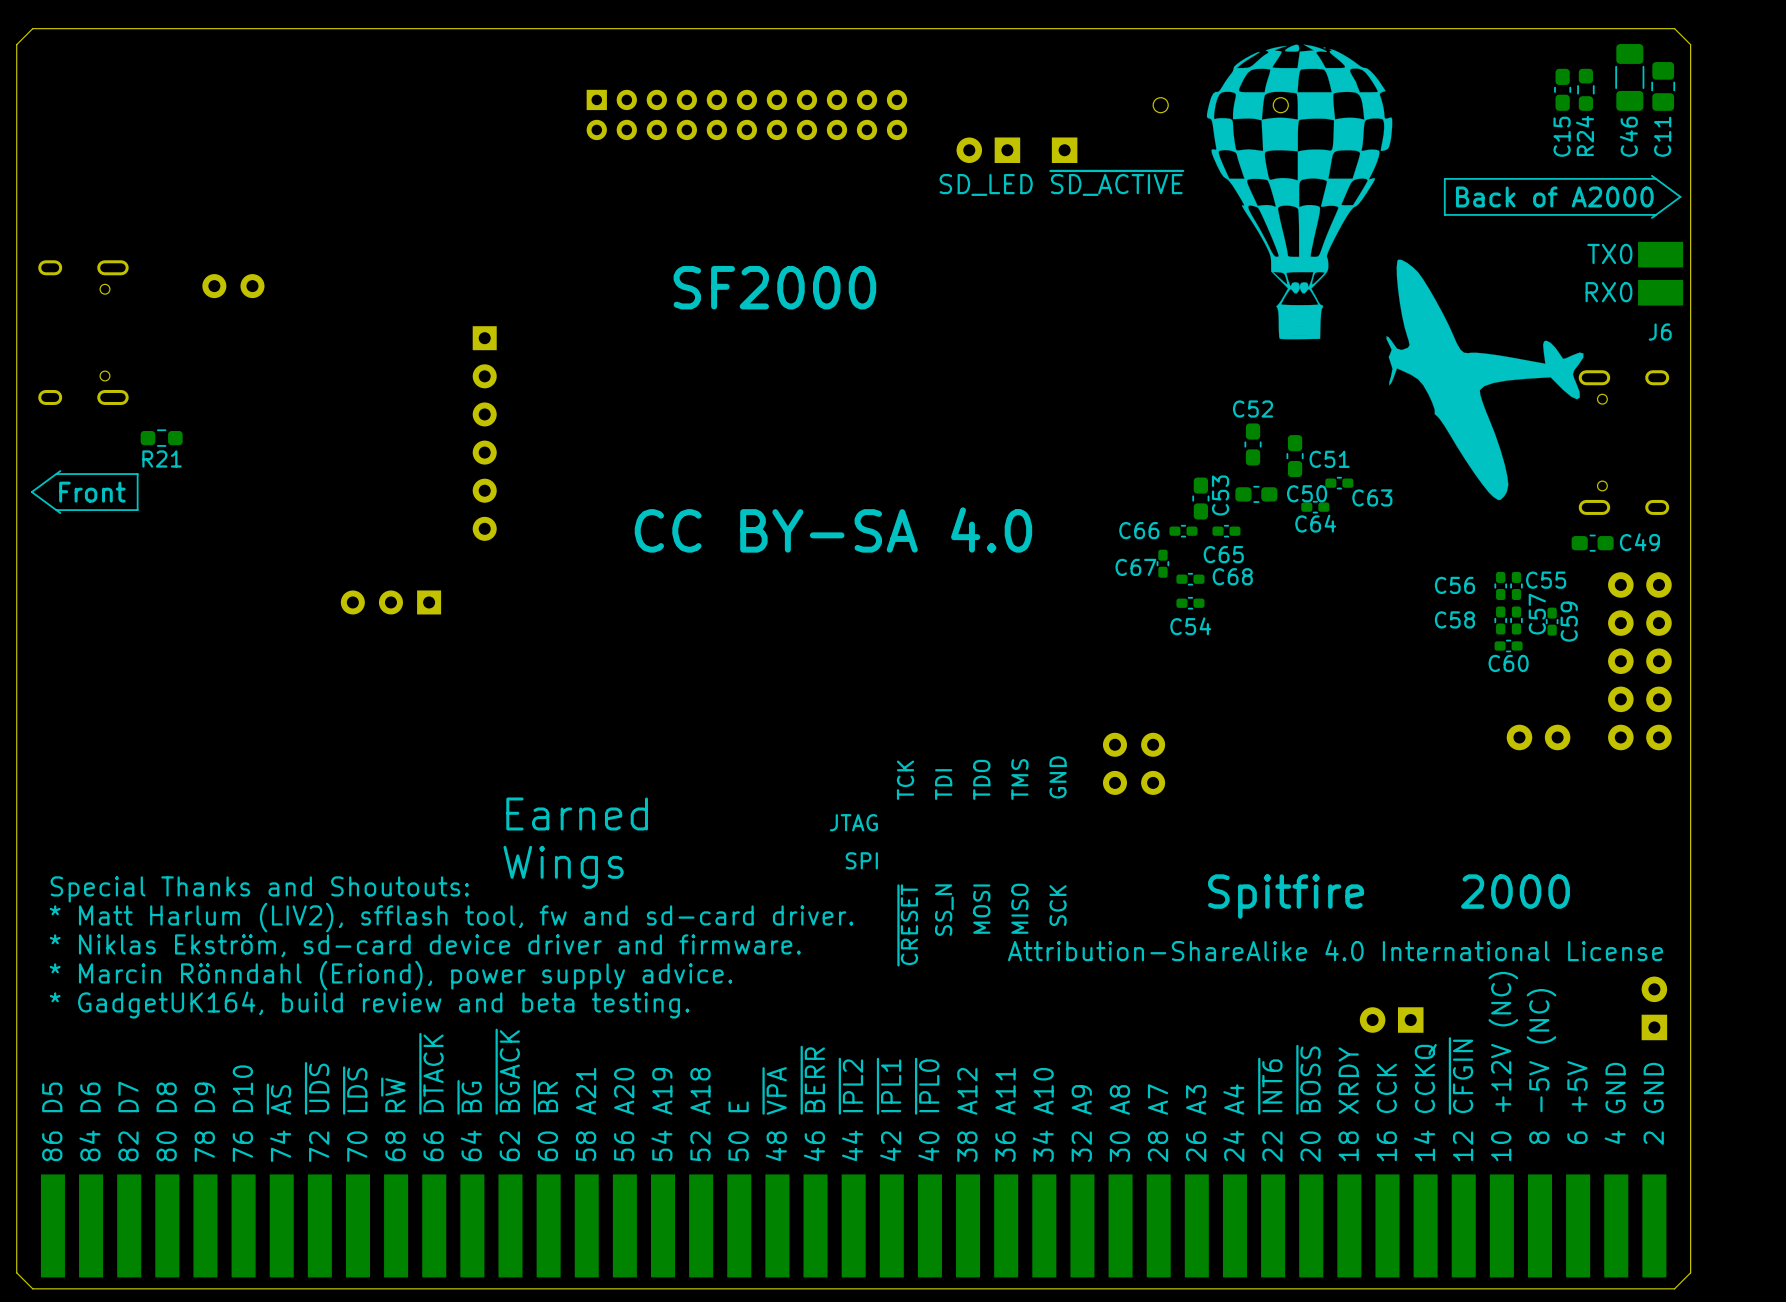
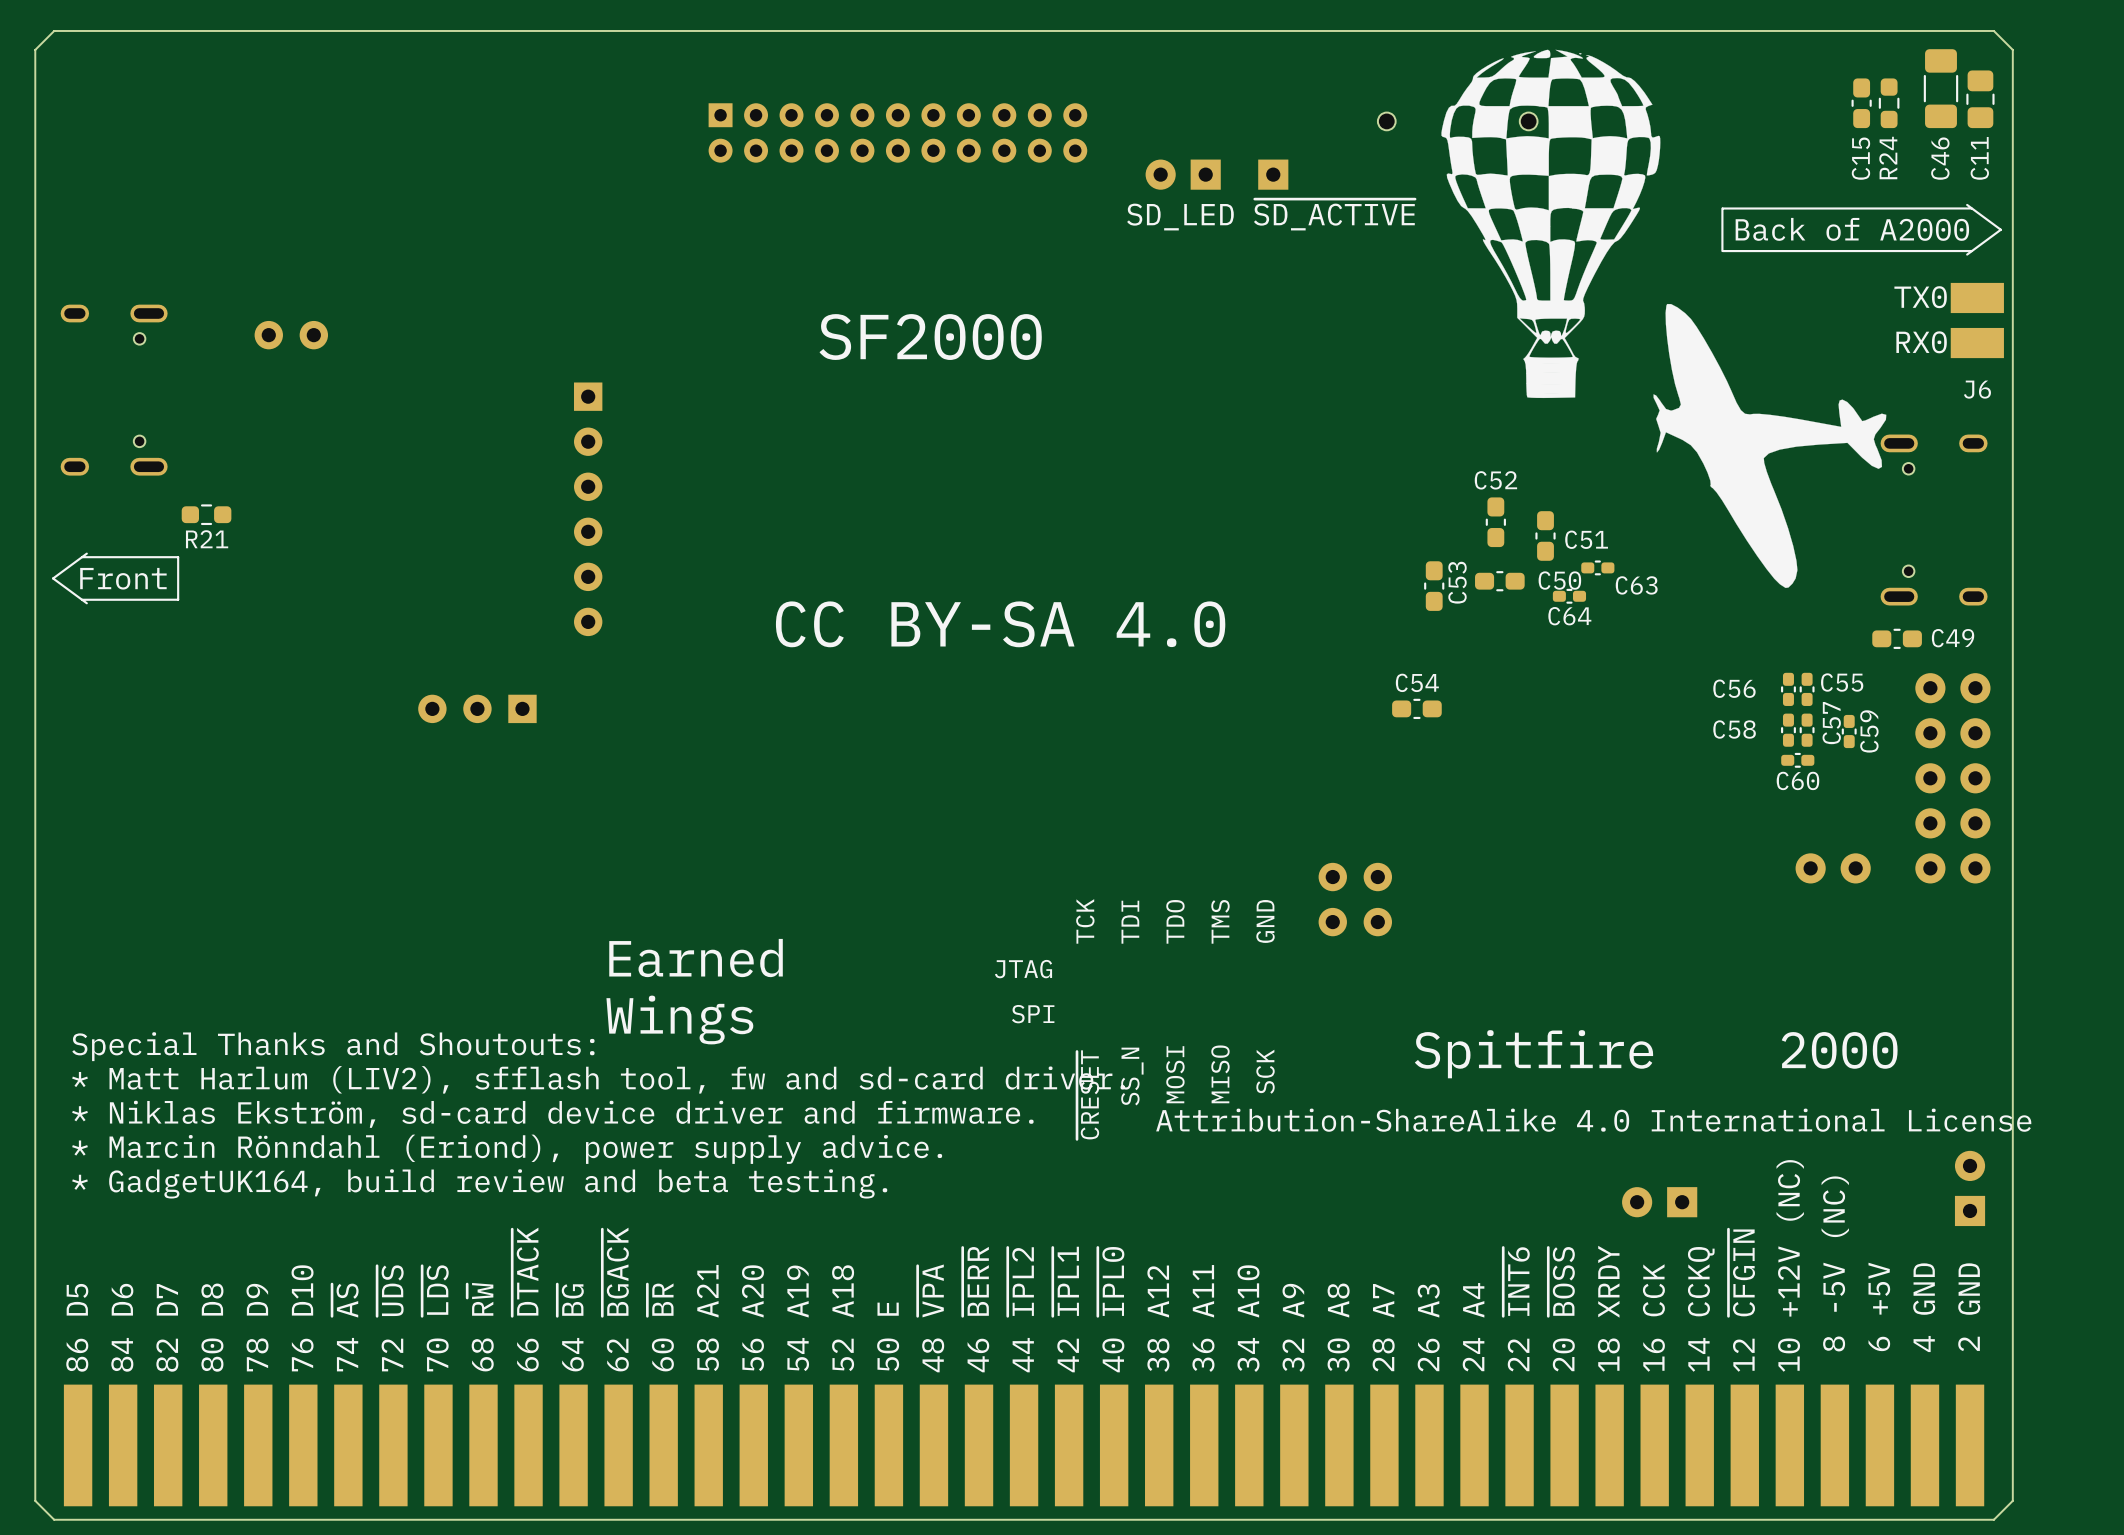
C66: (1183, 531) -> none
C65: (1226, 531) -> none
C67: (1162, 563) -> none
C68: (1190, 579) -> none
C54 footprint: [1176, 596, 1205, 610] -> [1392, 698, 1442, 720]
C54 name position: C54 (1190, 626) -> C54 (1417, 682)

